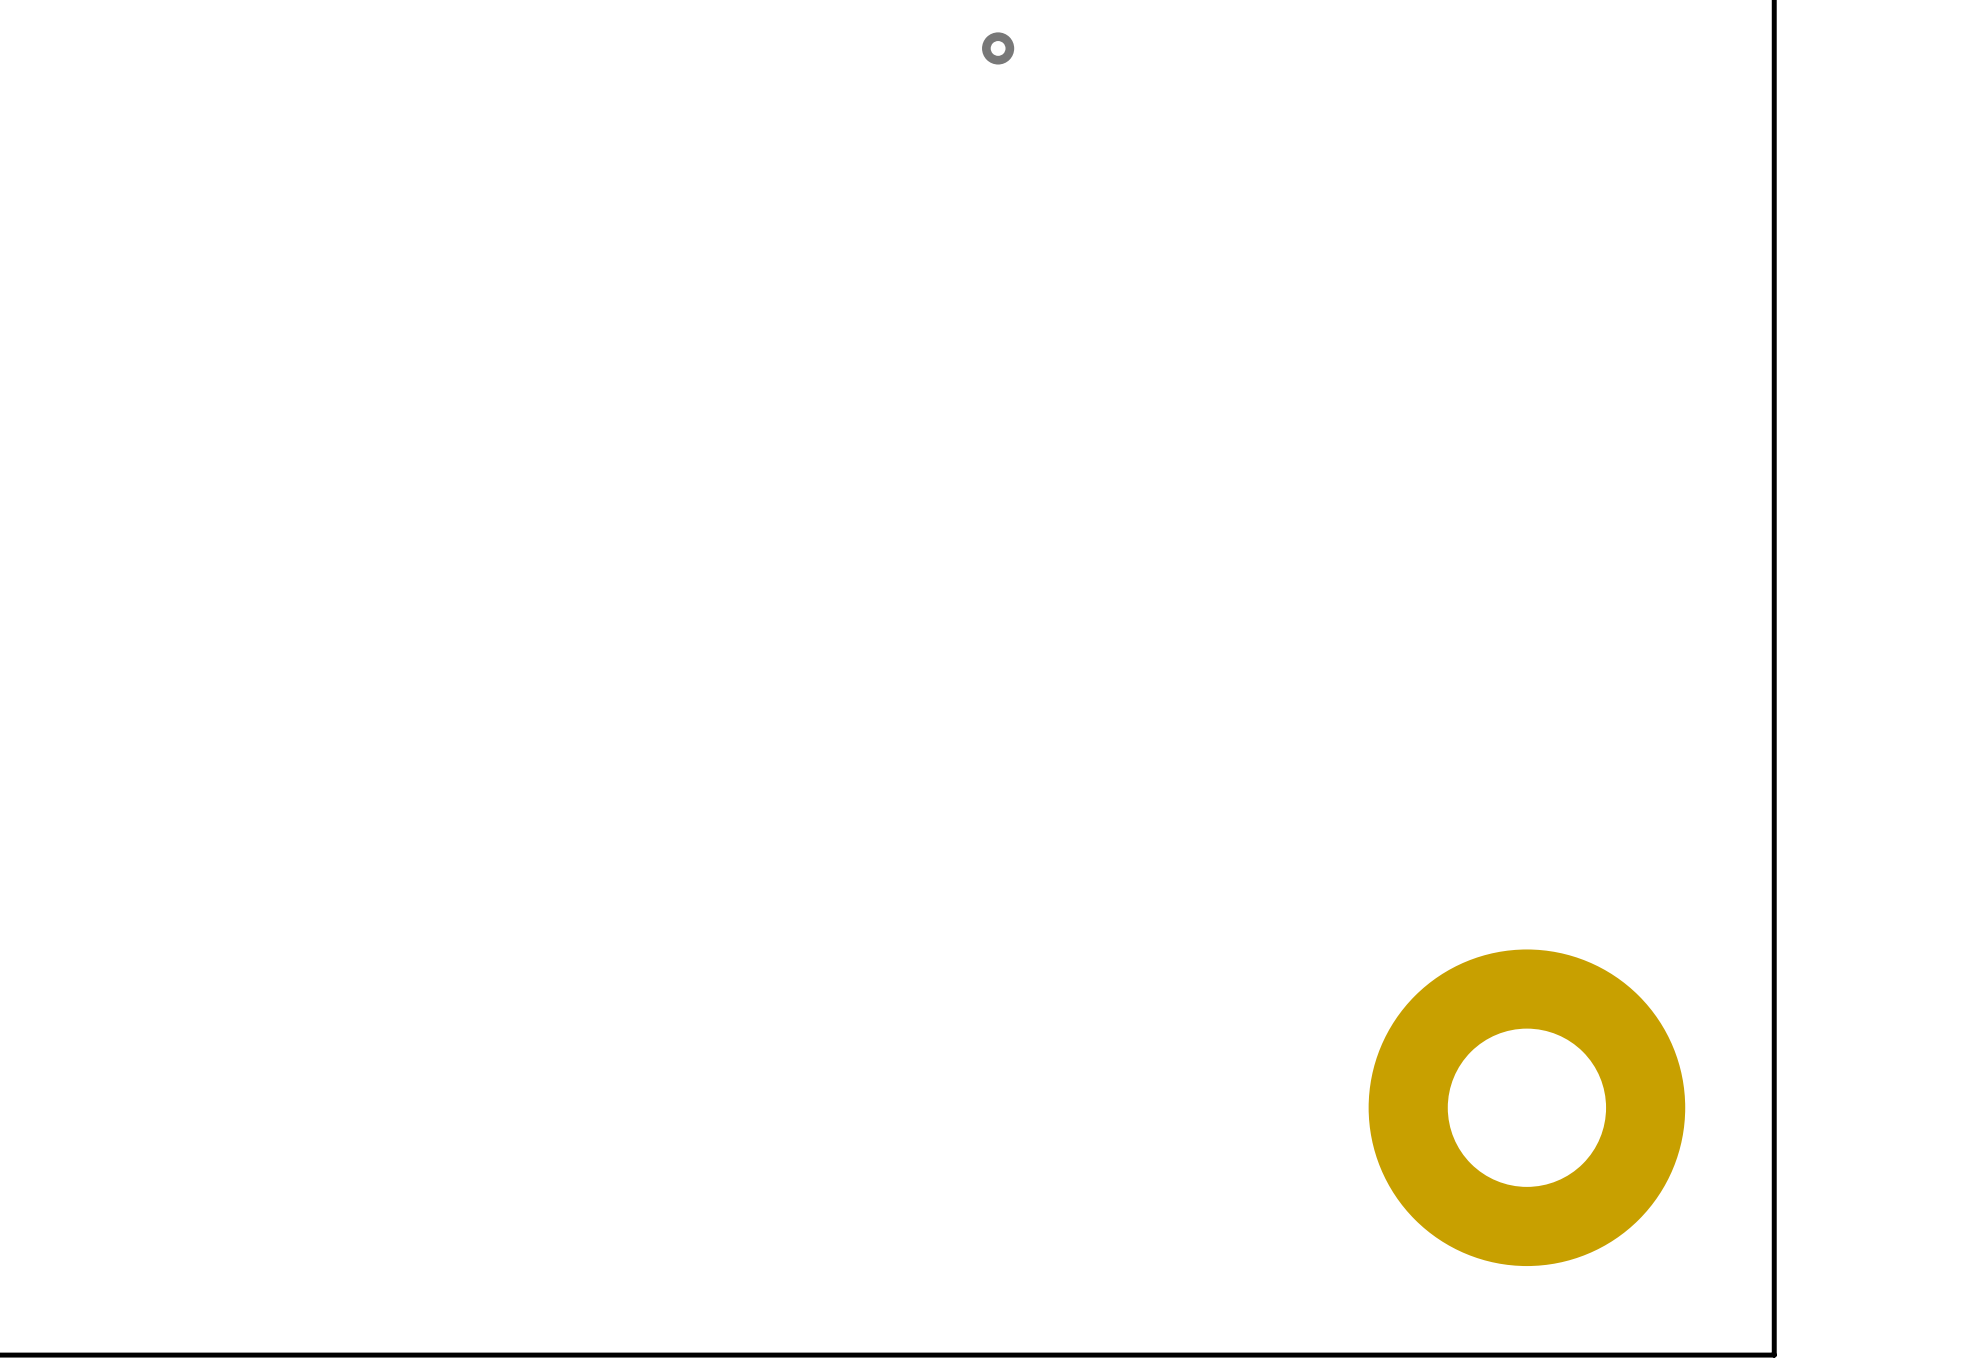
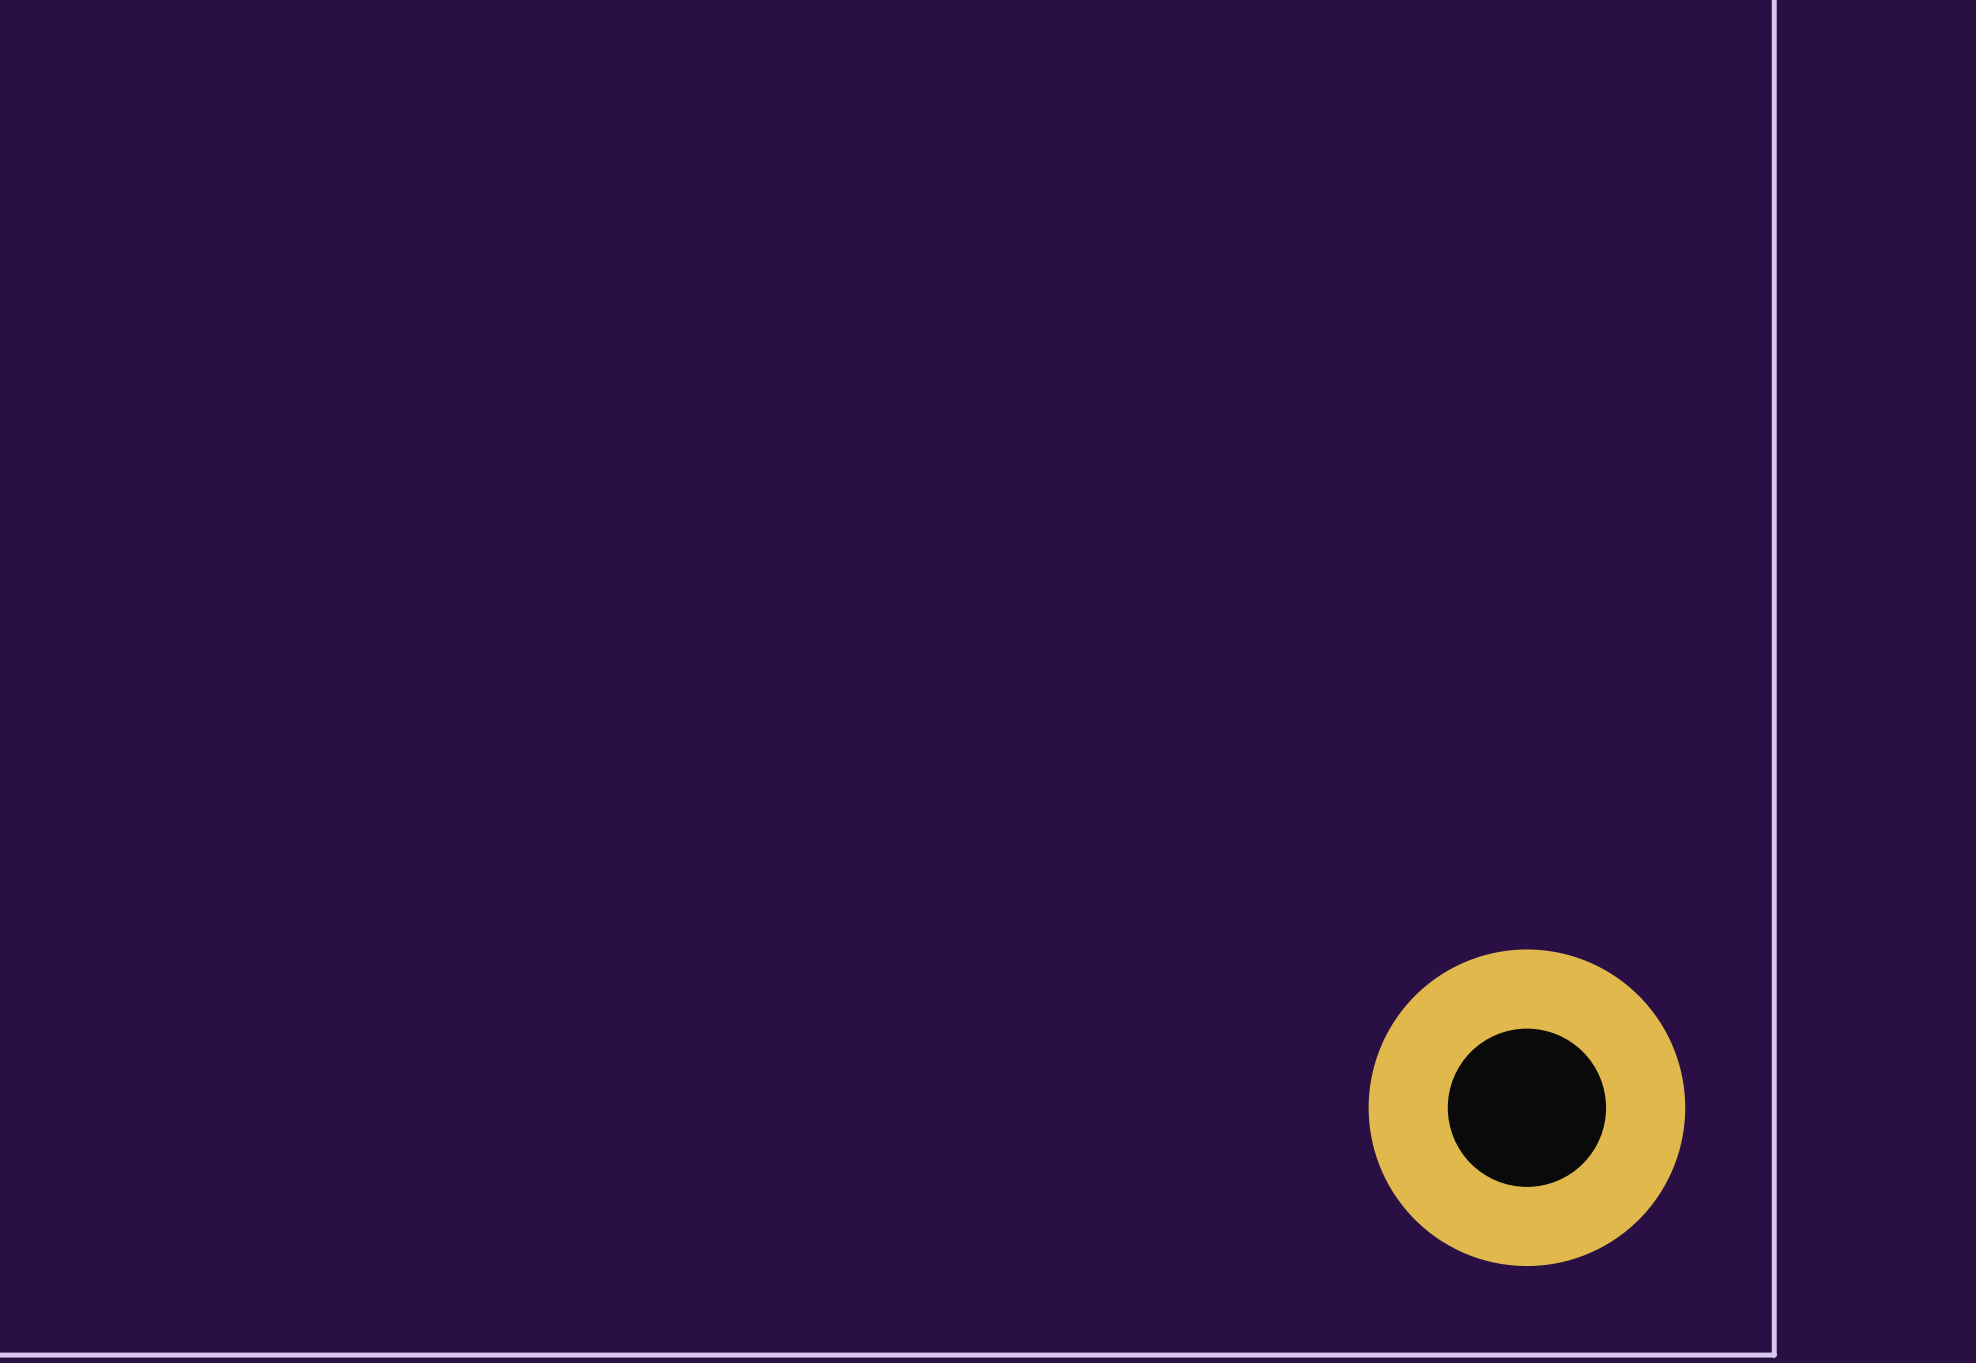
via: (998, 48) -> none

